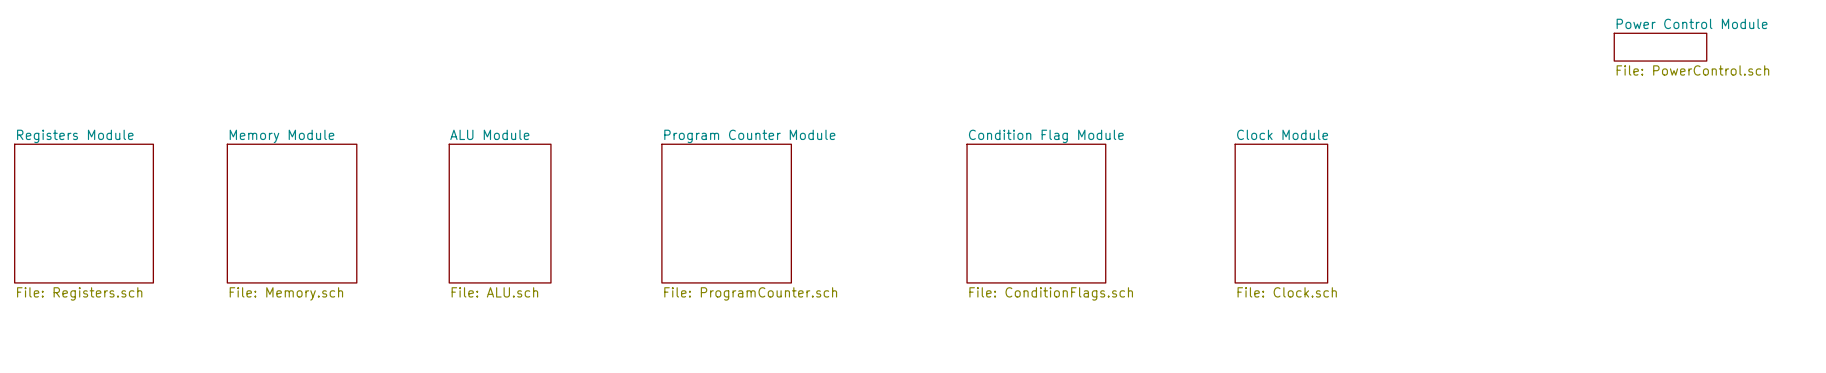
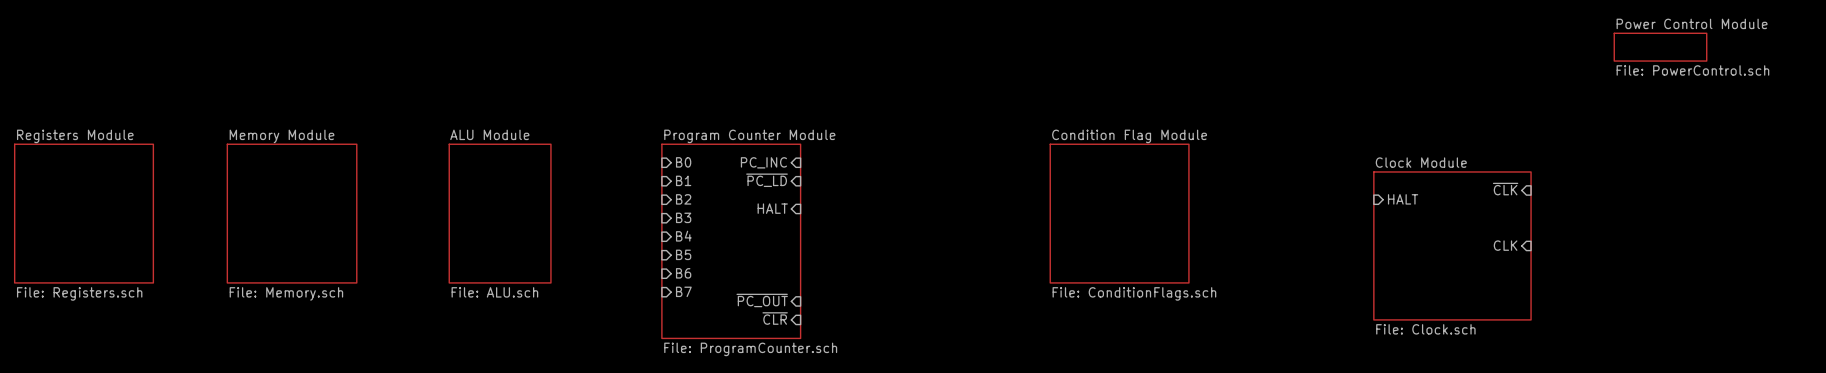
sheet pin: none -> B0 (683, 162)
sheet pin: none -> PC_INC (763, 162)
sheet pin: none -> B1 (683, 180)
sheet pin: none -> ~{PC_LD} (766, 180)
sheet pin: none -> ~{CLK} (1505, 189)
sheet pin: none -> B2 (683, 199)
sheet pin: none -> HALT (1403, 199)
sheet pin: none -> HALT (772, 208)
sheet Program Counter Module: File: ProgramCounter.sch (726, 213) -> none
sheet Condition Flag Module position: (1036, 213) -> (1119, 213)
sheet Clock Module: File: Clock.sch (1281, 213) -> none
sheet pin: none -> B3 (683, 217)
sheet pin: none -> B4 (683, 236)
sheet Program Counter Module: none -> File: ProgramCounter.sch (731, 241)
sheet Clock Module: none -> File: Clock.sch (1452, 245)
sheet pin: none -> CLK (1505, 245)
sheet pin: none -> B5 (683, 254)
sheet pin: none -> B6 (683, 273)
sheet pin: none -> B7 (683, 291)
sheet pin: none -> ~{PC_OUT} (762, 300)
sheet pin: none -> ~{CLR} (775, 318)

